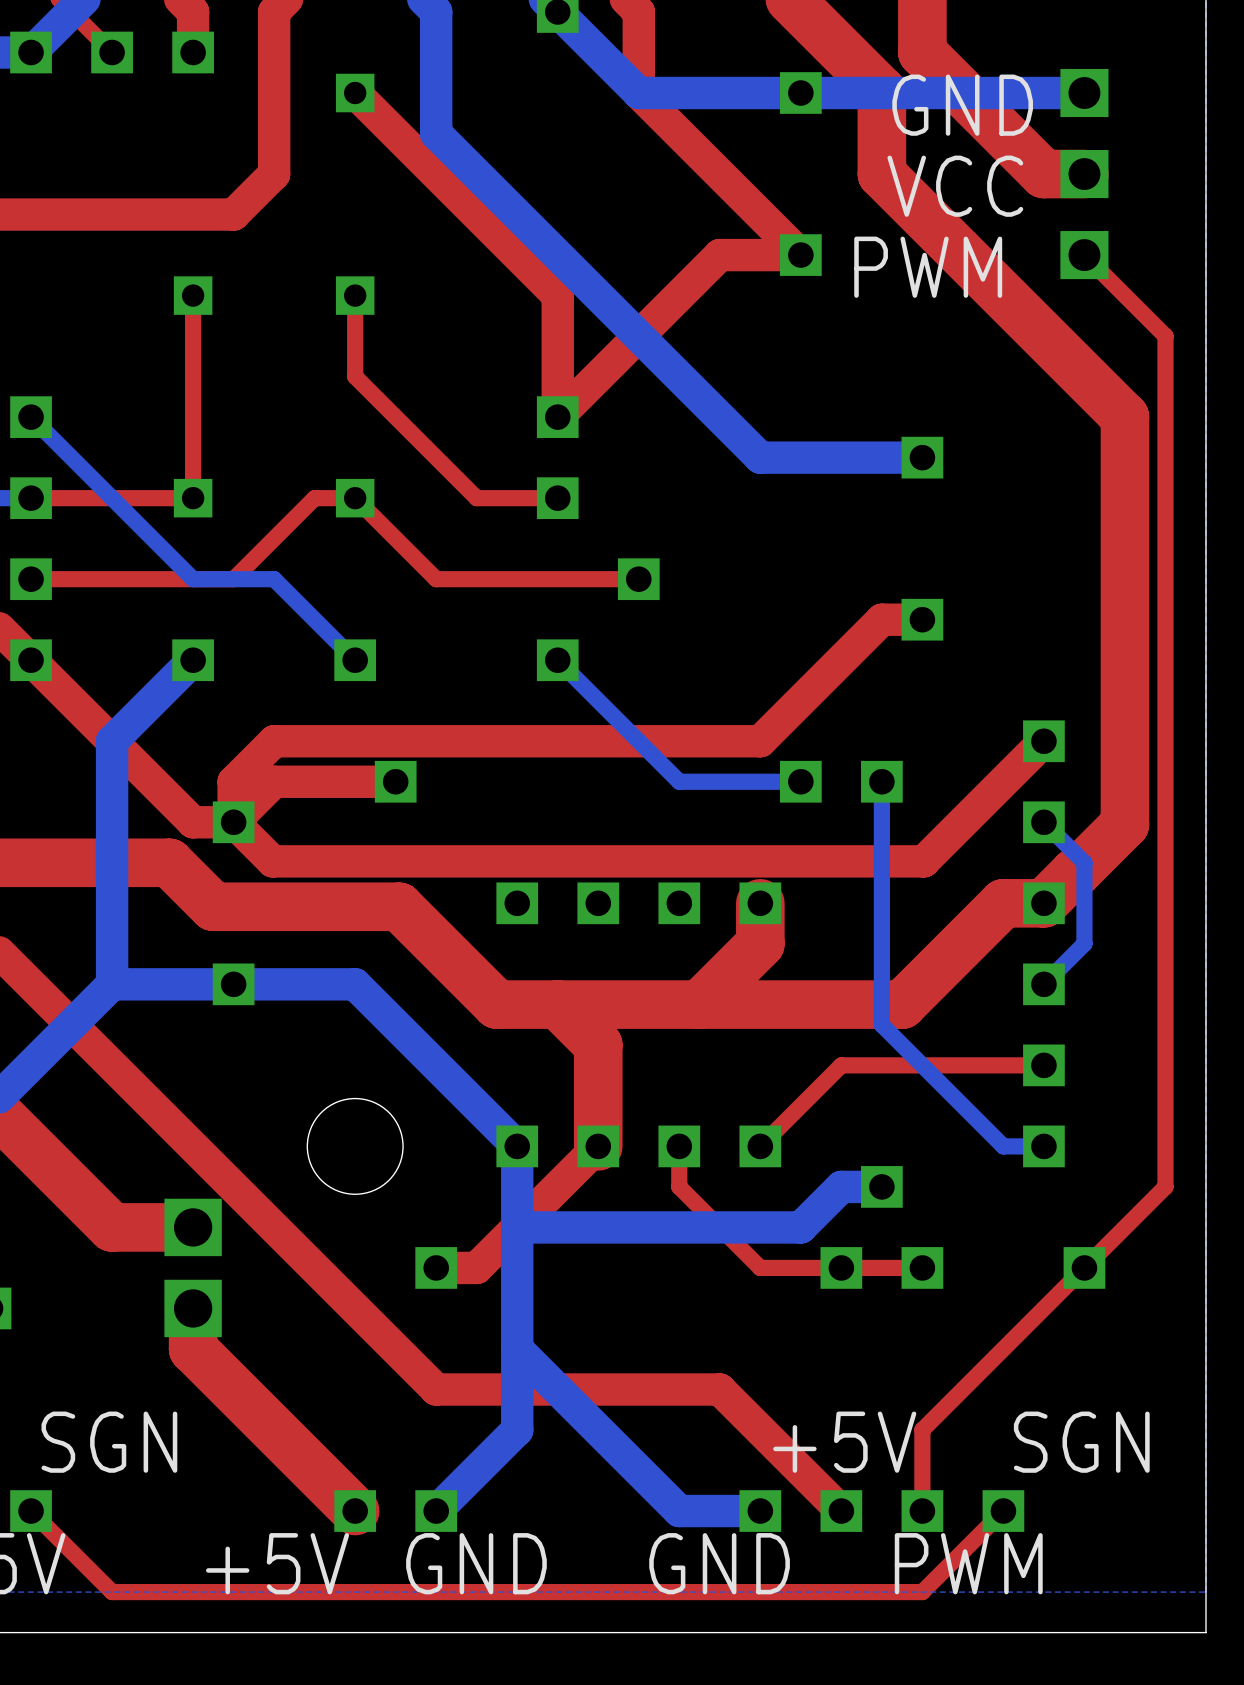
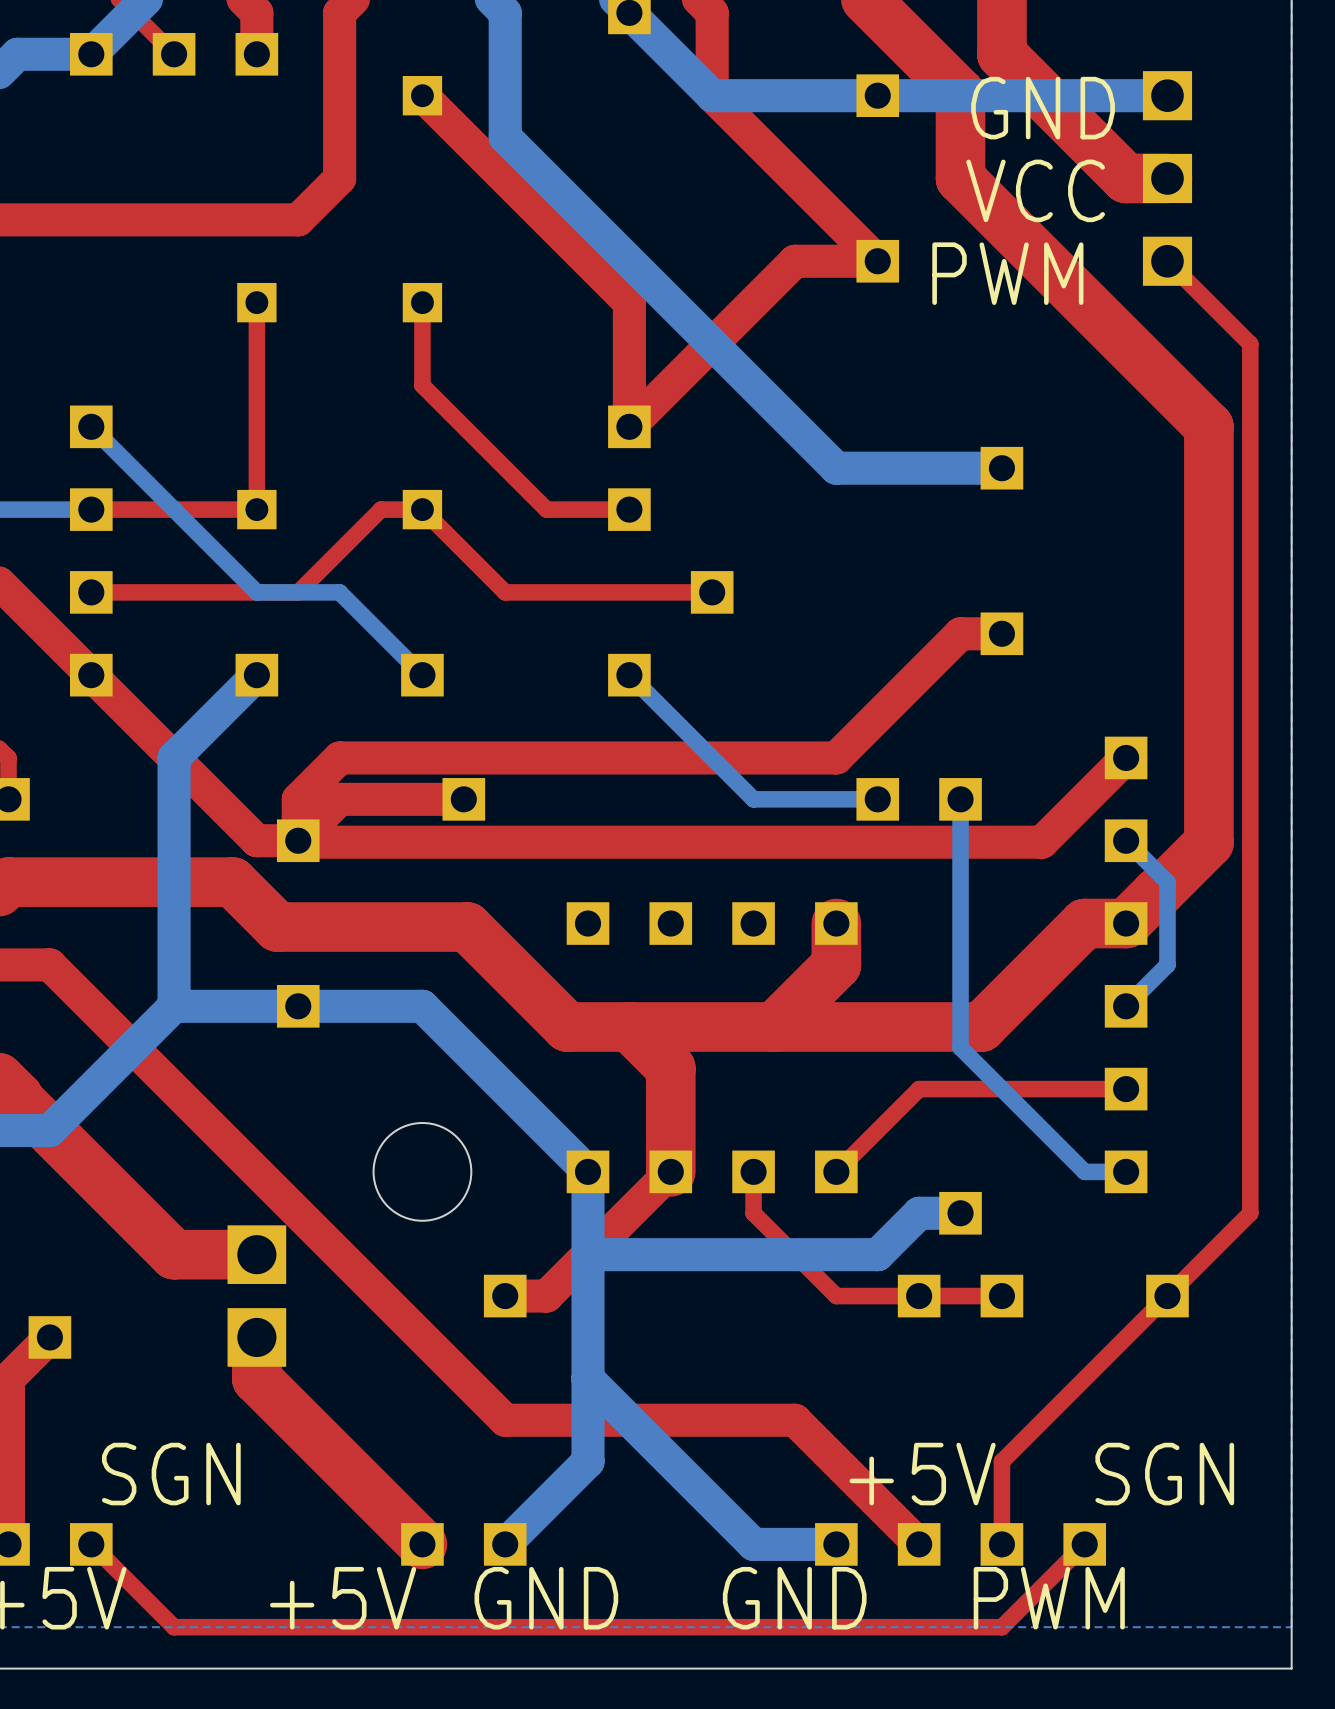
top track: (961, 823) (923, 861) (272, 861) (235, 823) -> (1041, 842) (299, 842)

